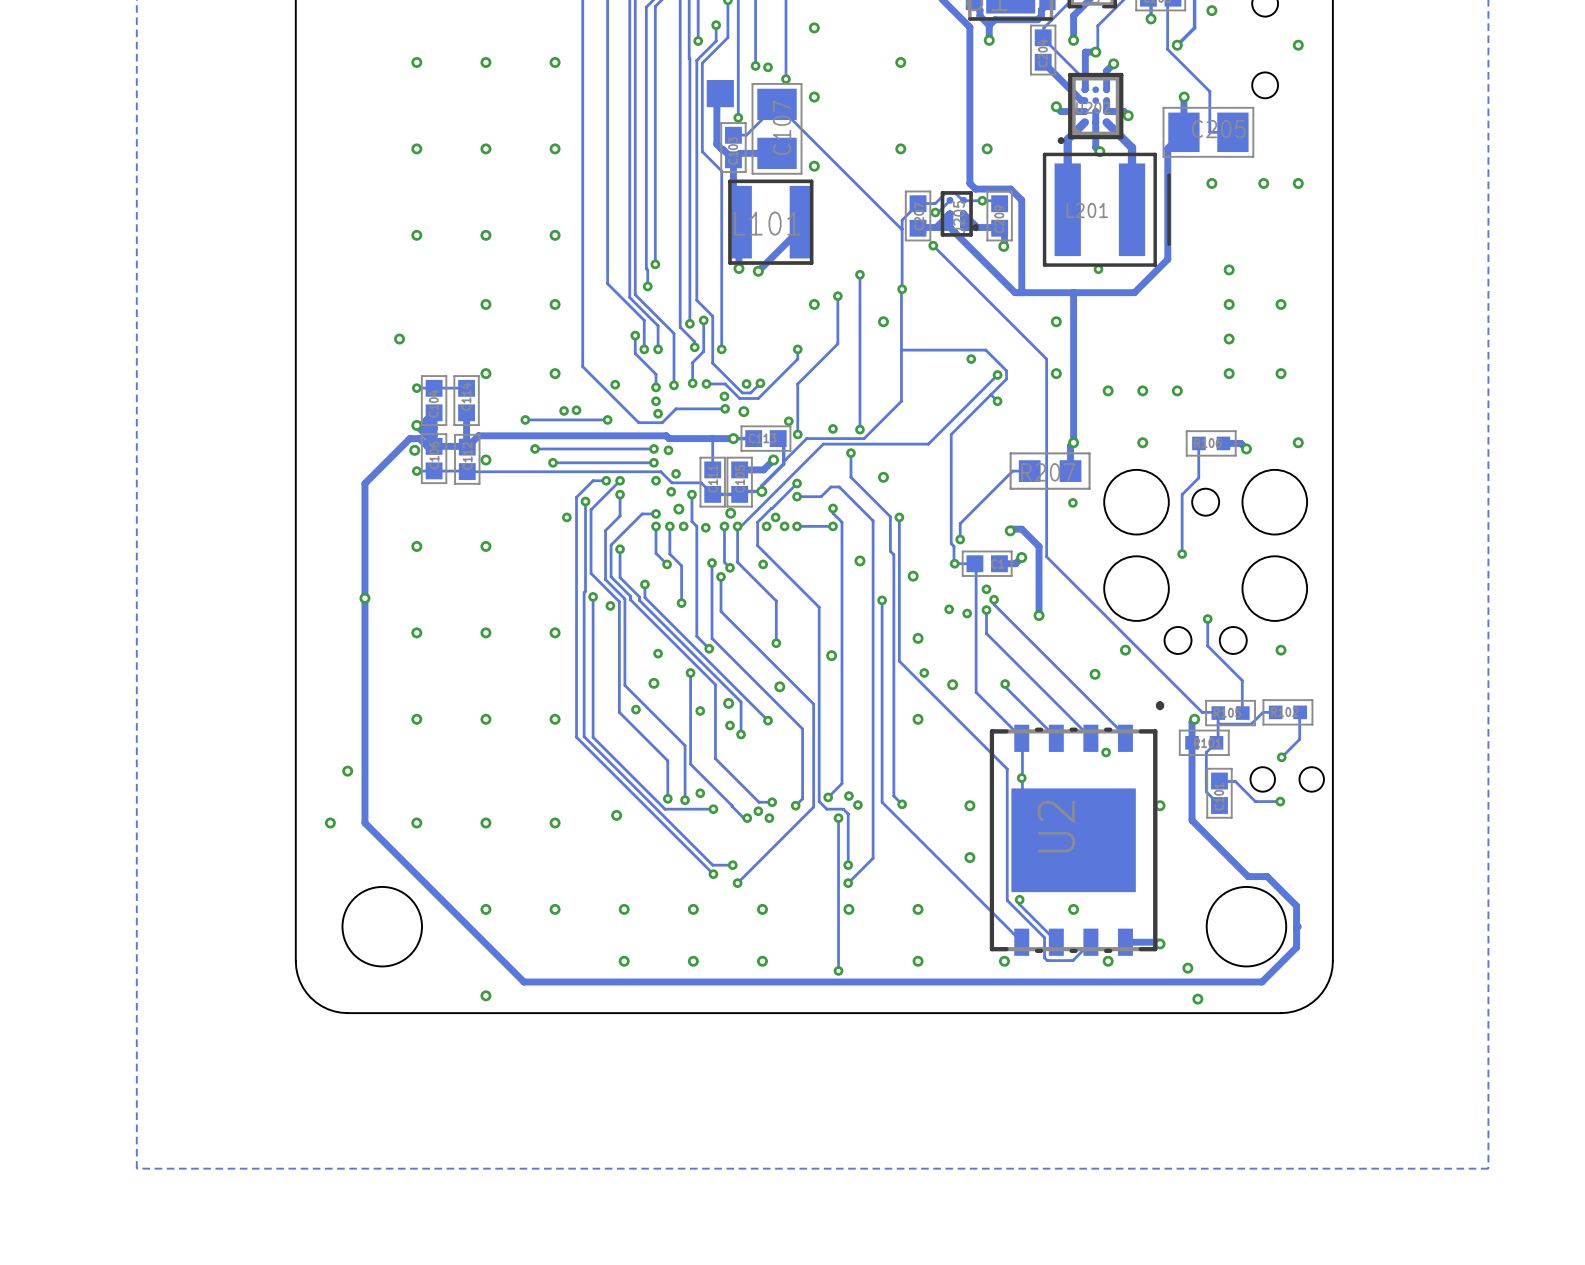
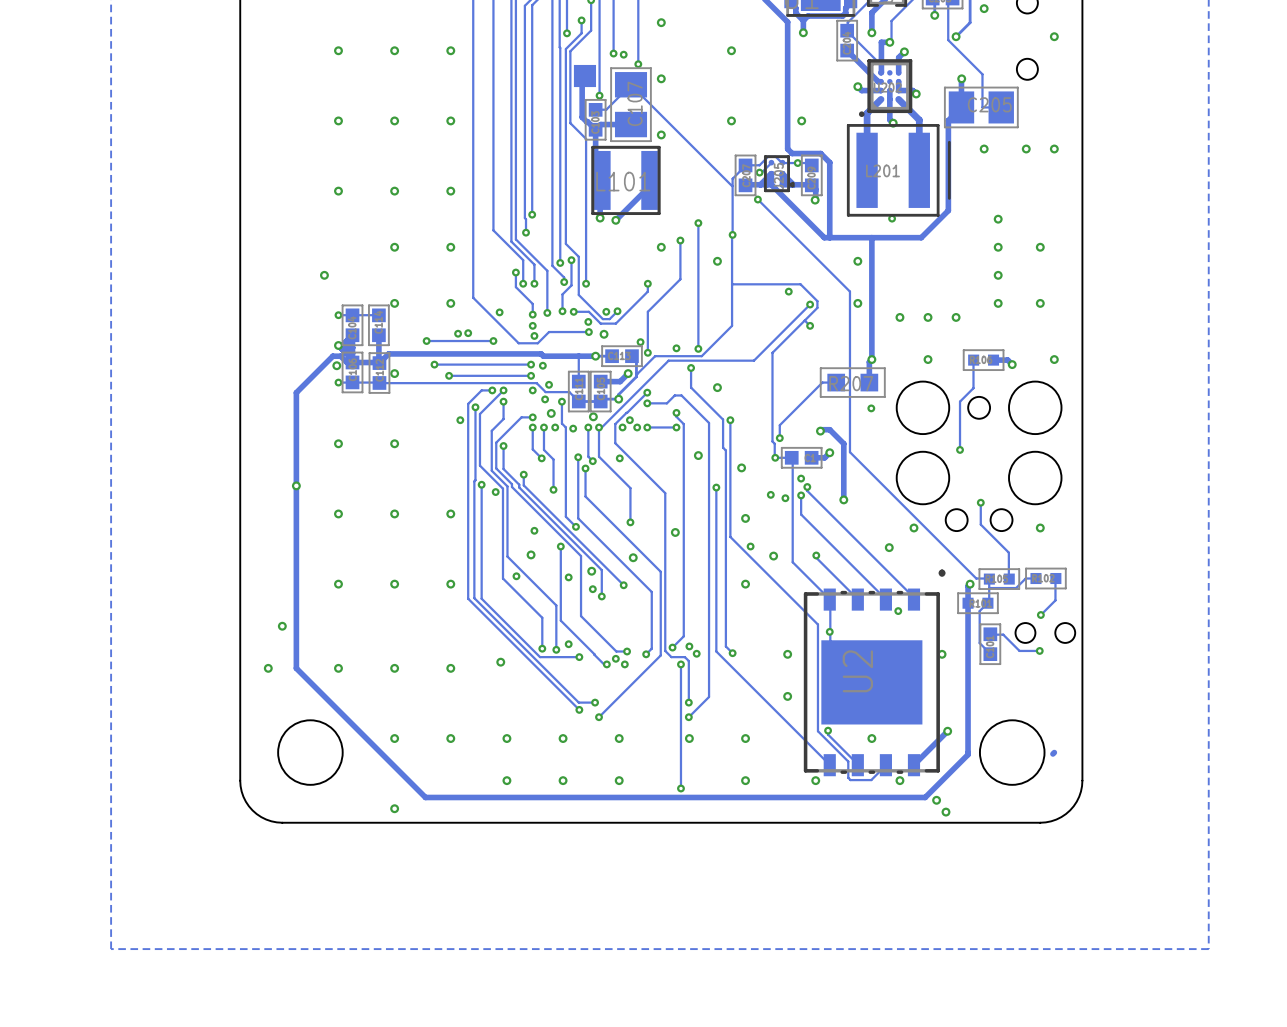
track: (1192, 820) (1248, 876) (1267, 876) (1296, 905) (1296, 947) (1262, 982) (1139, 982) -> (968, 666) (968, 754) (925, 797)
via: none -> (947, 731)
track: (1125, 942) (1158, 942) (1160, 943) -> (913, 764) (947, 731)
via: (1160, 943) -> none
via: (1187, 968) -> none
via: none -> (936, 800)
via: none -> (945, 812)
via: (1197, 999) -> none

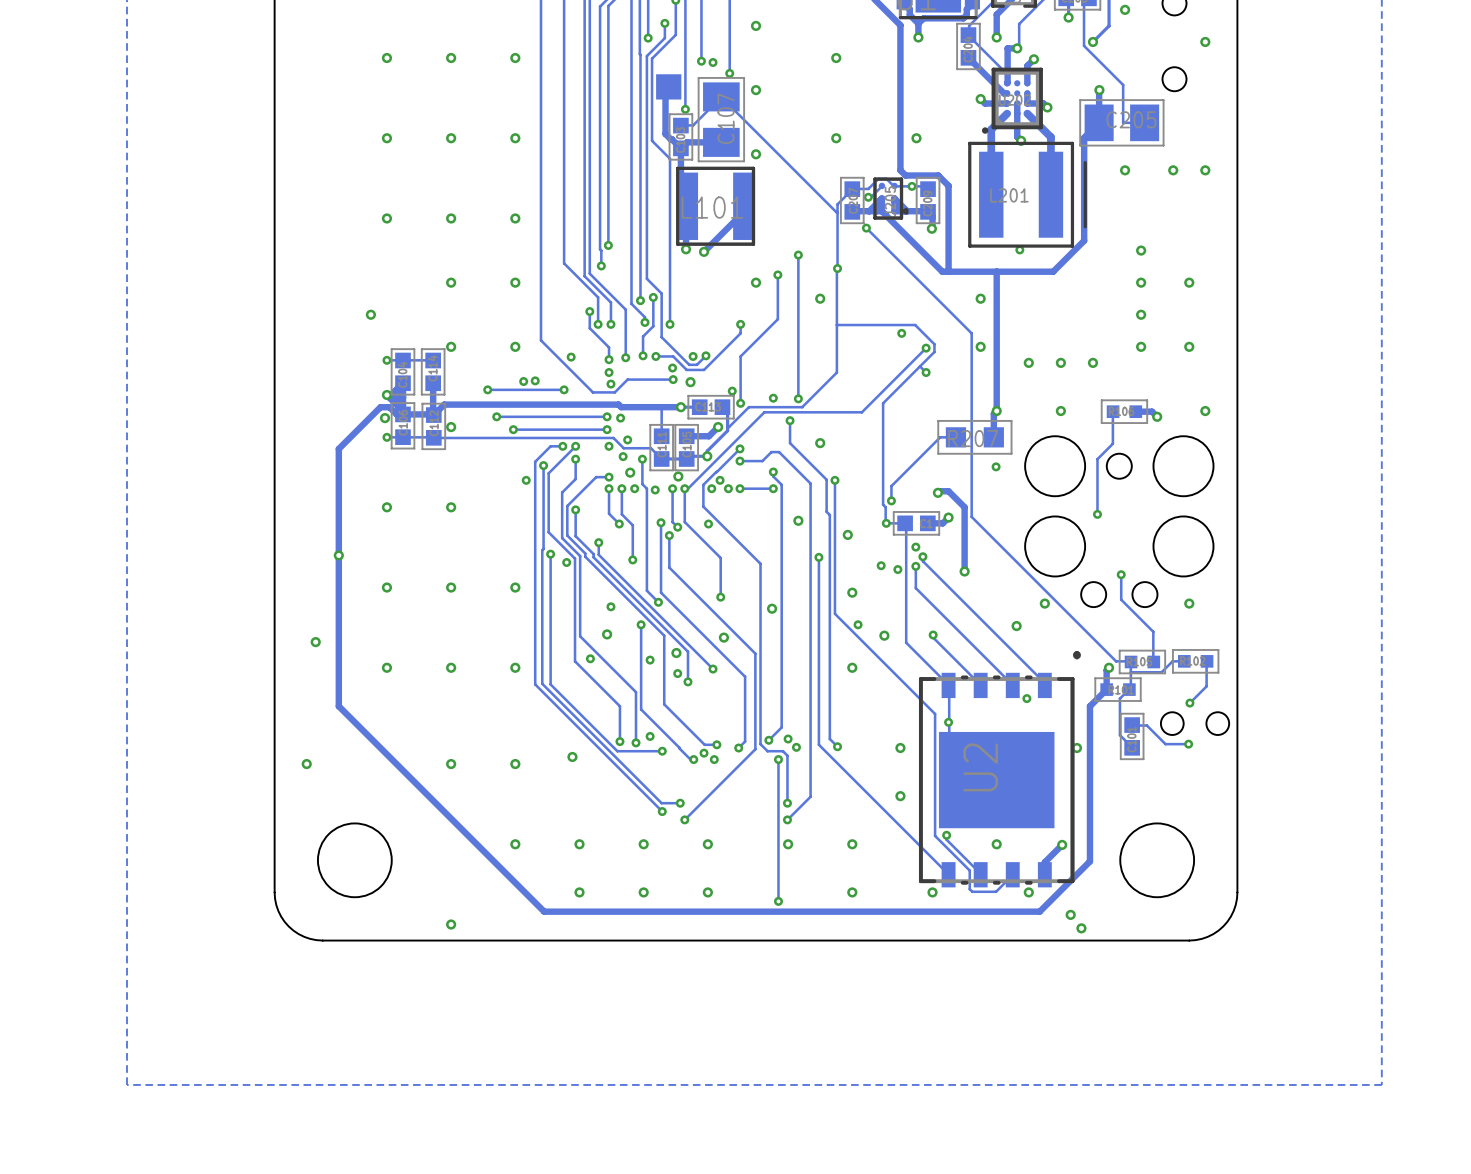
via: none -> (315, 642)
track: (968, 603) (968, 754) (925, 797) (909, 797) -> (1106, 689) (1089, 706) (1089, 861) (1039, 911)
track: (296, 617) (296, 668) (425, 797) (476, 797) -> (338, 706) (544, 911)
via: (282, 626) -> none
via: (338, 668) -> none
track: (947, 731) (913, 764) -> (1062, 844) (1044, 862) (1044, 874)
via position: (947, 731) -> (1062, 844)
via: (394, 738) -> none
track: (1054, 752) (1052, 753) -> none

